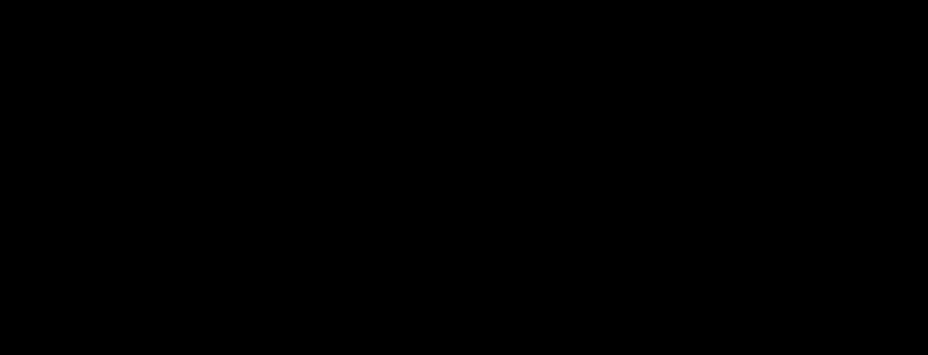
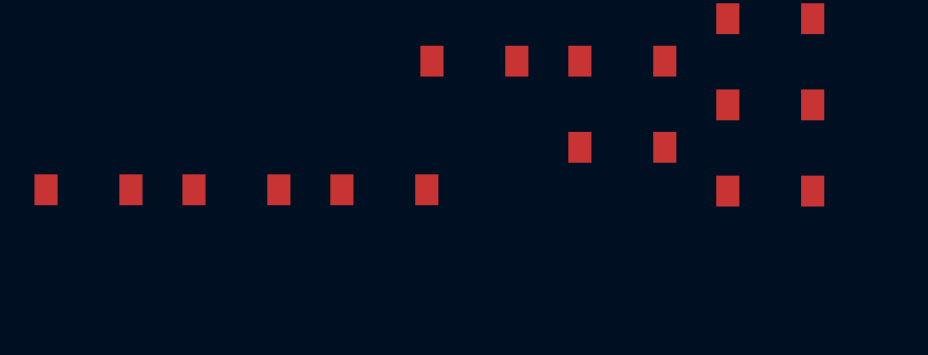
part: none -> (770, 18)
part: none -> (474, 61)
part: none -> (622, 61)
part: none -> (770, 104)
part: none -> (622, 147)
part: none -> (88, 189)
part: none -> (236, 189)
part: none -> (384, 189)
part: none -> (770, 191)

